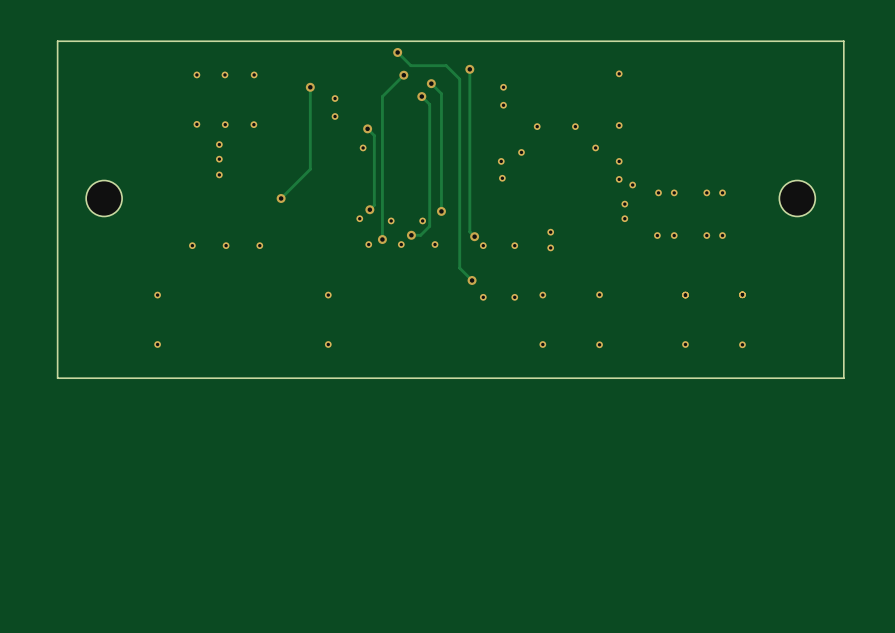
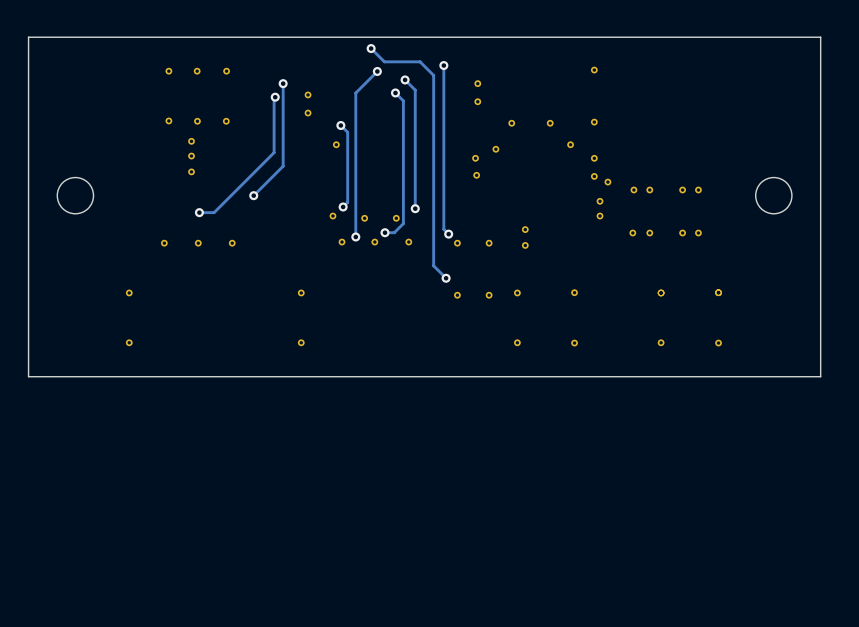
track: none -> (275, 97) (274, 152) (214, 212) (199, 212)
via: none -> (275, 97)
via: none -> (199, 212)

